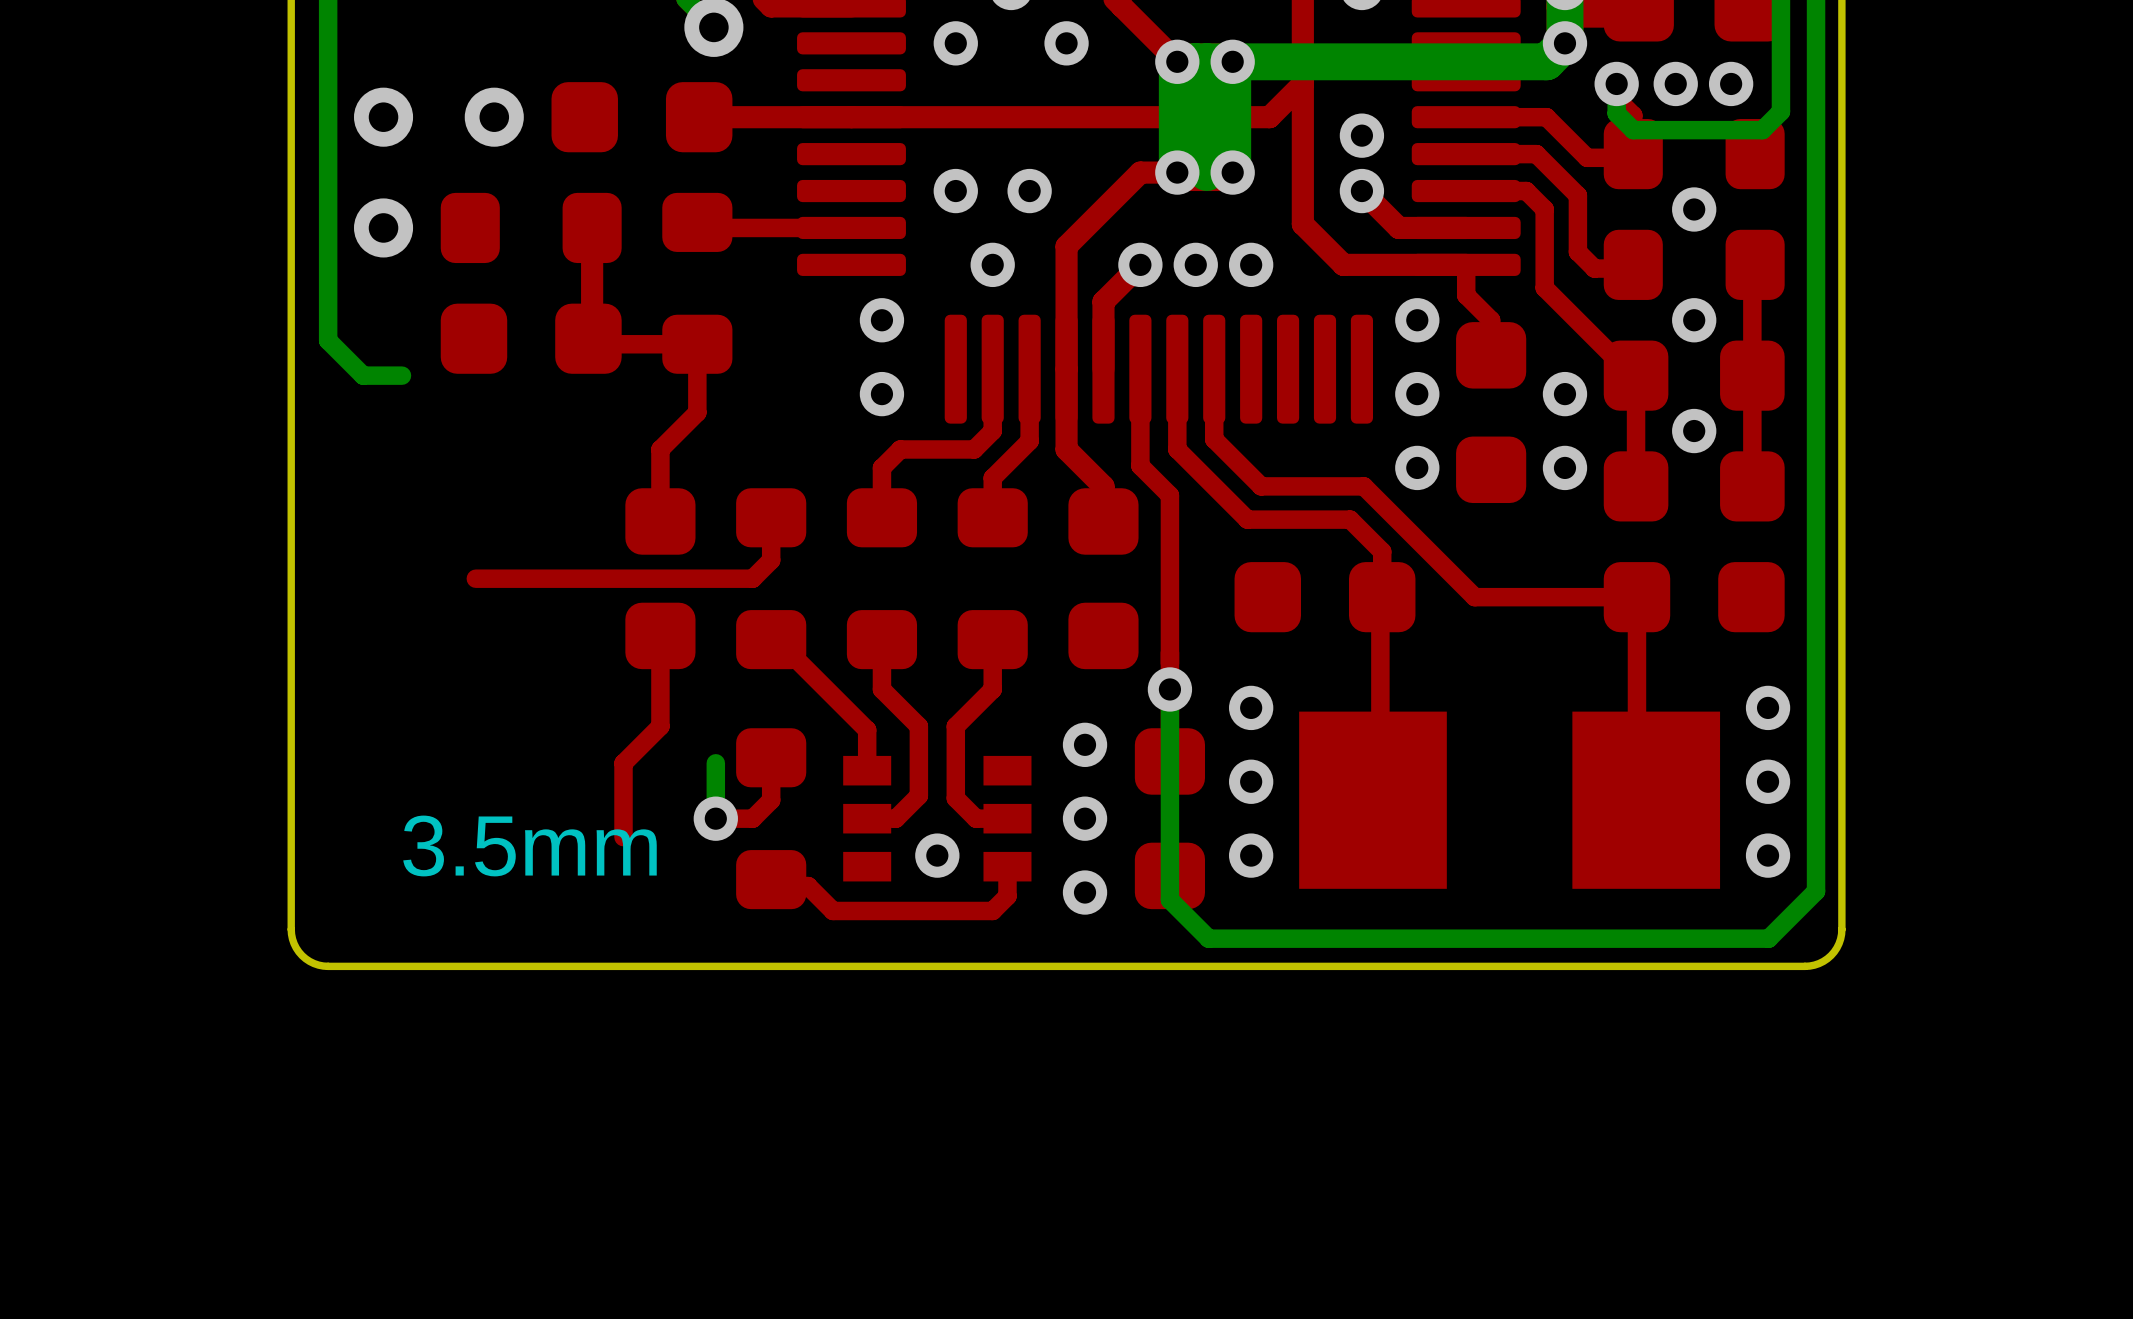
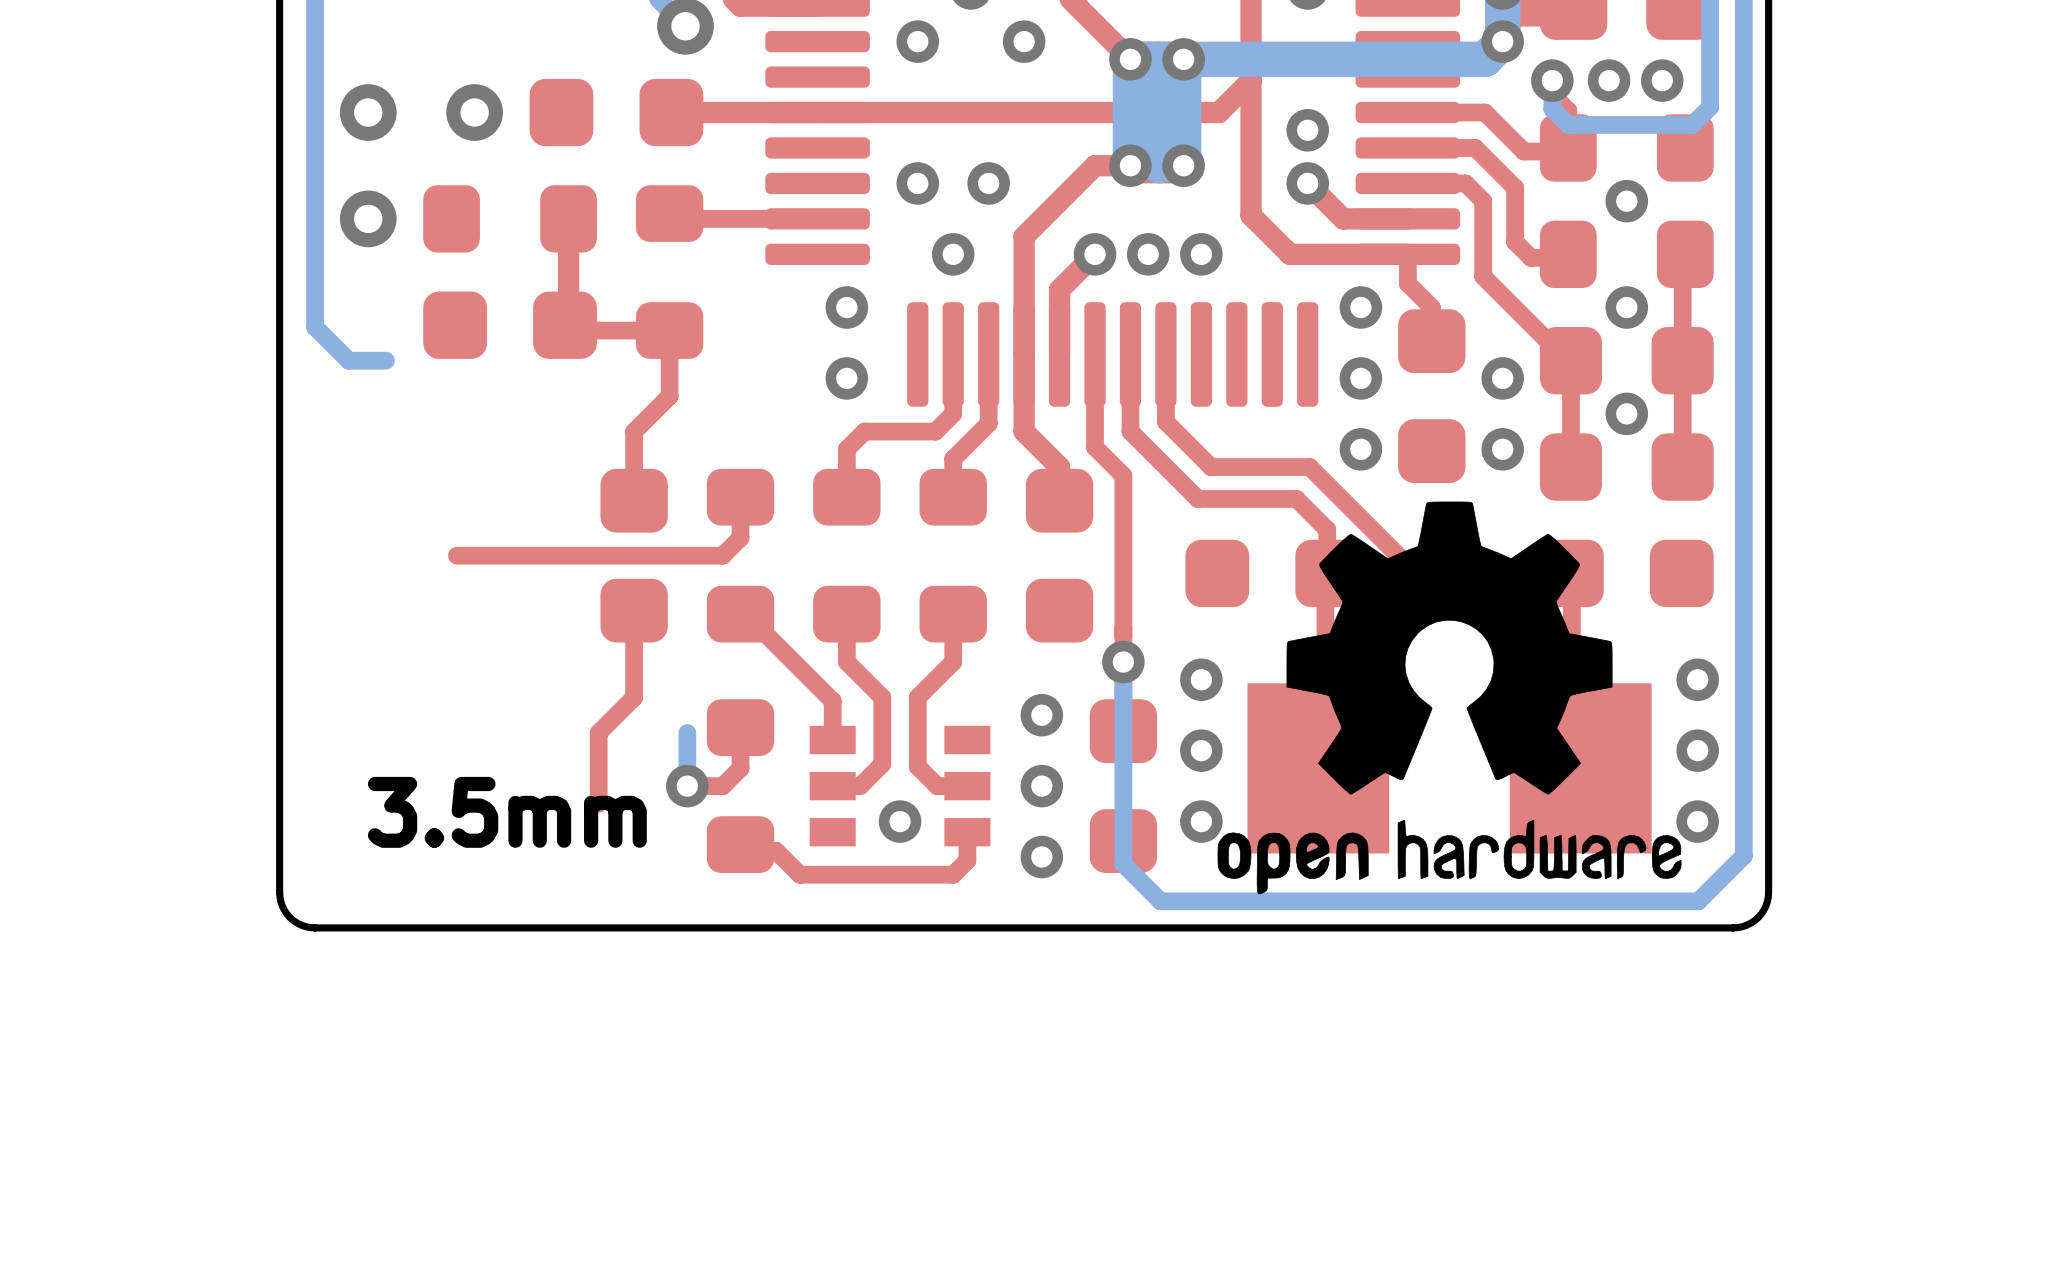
drawing: none -> [1217, 501, 1682, 895]

